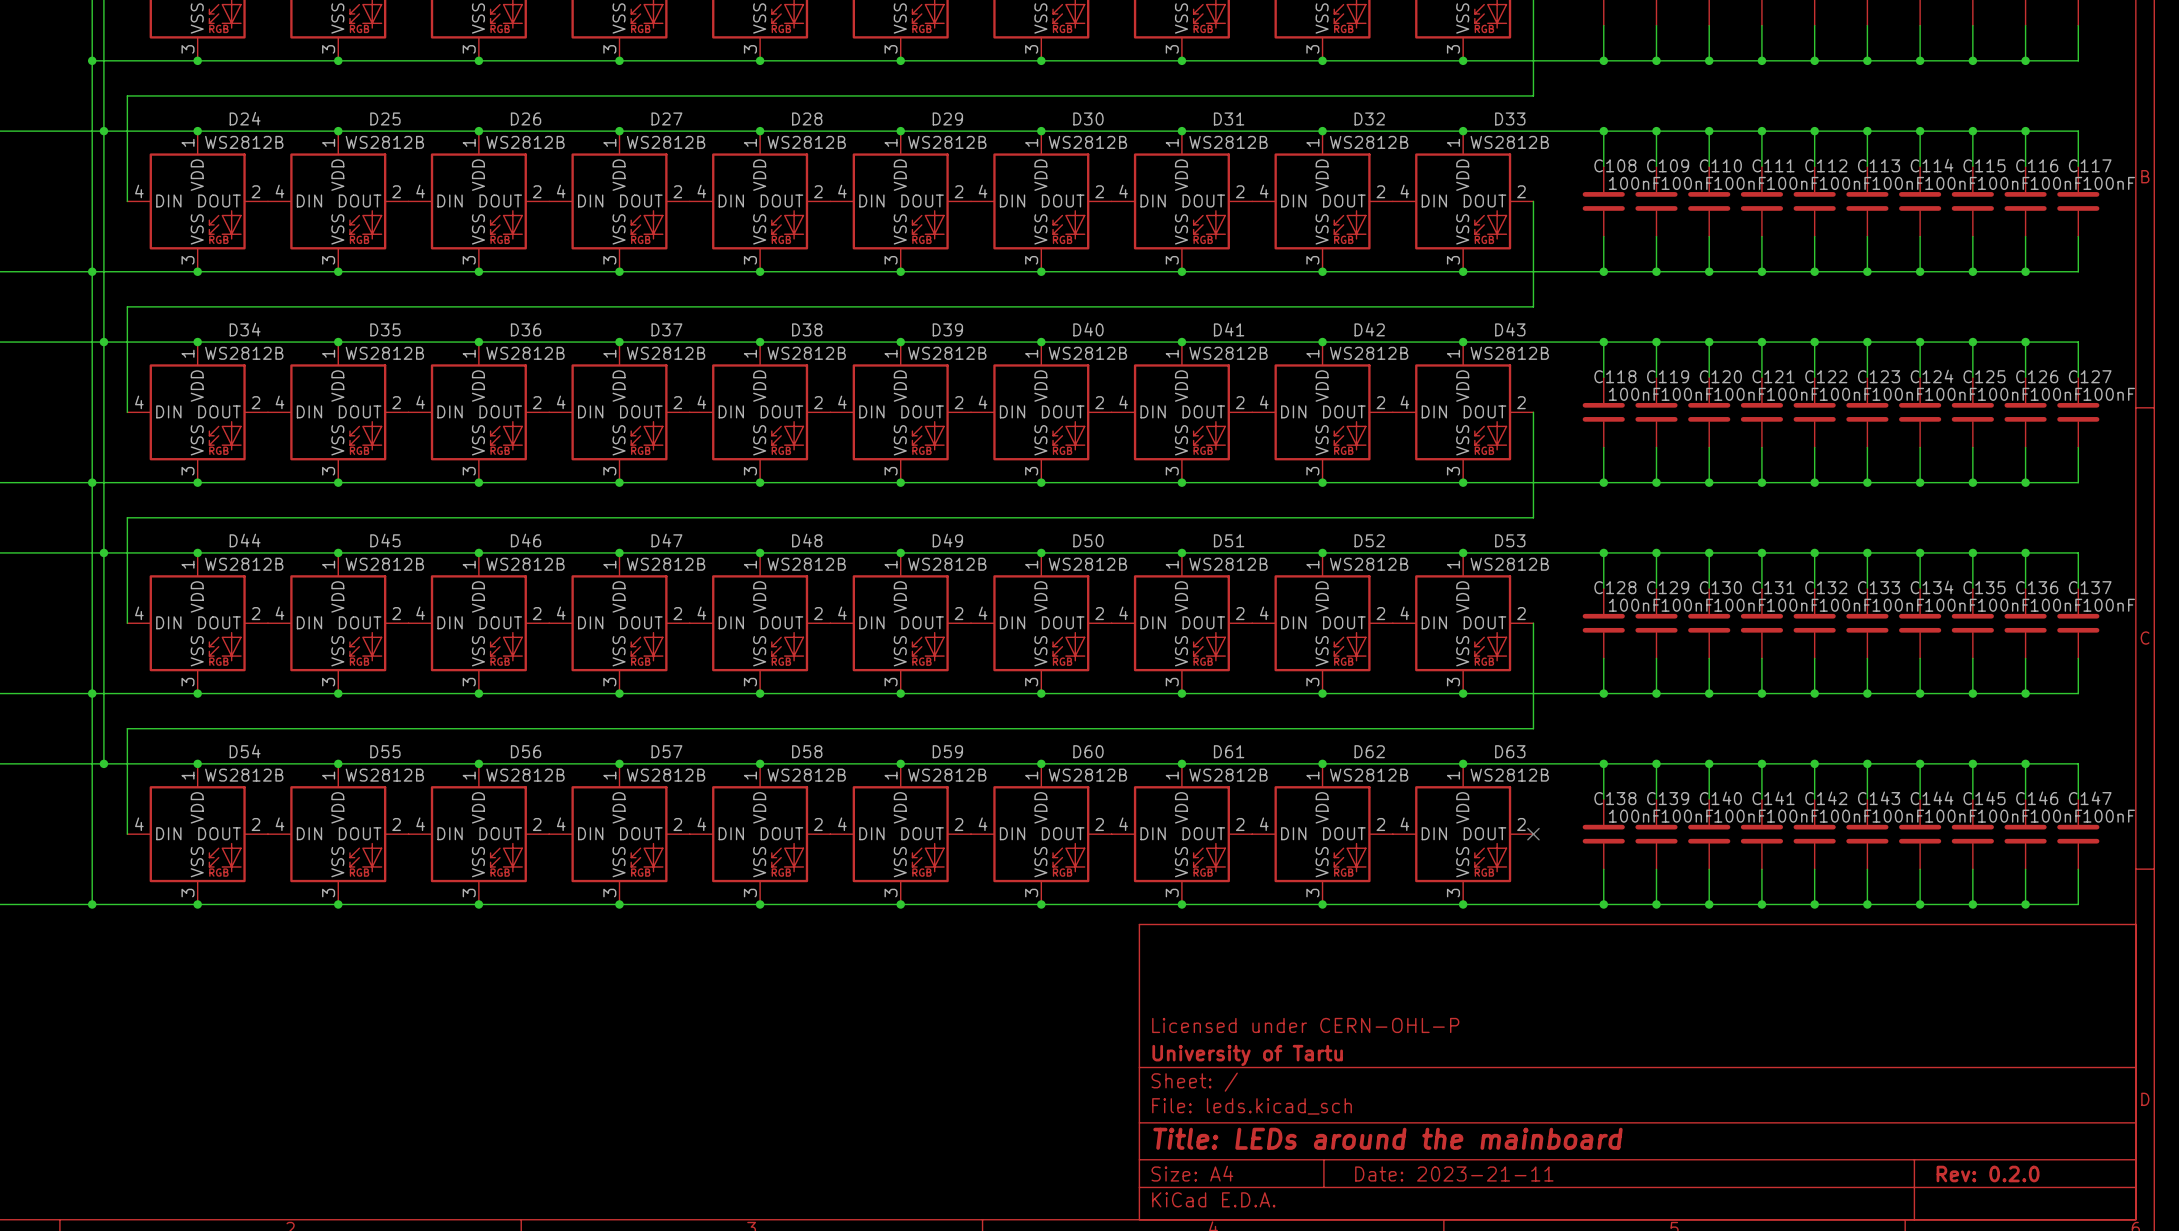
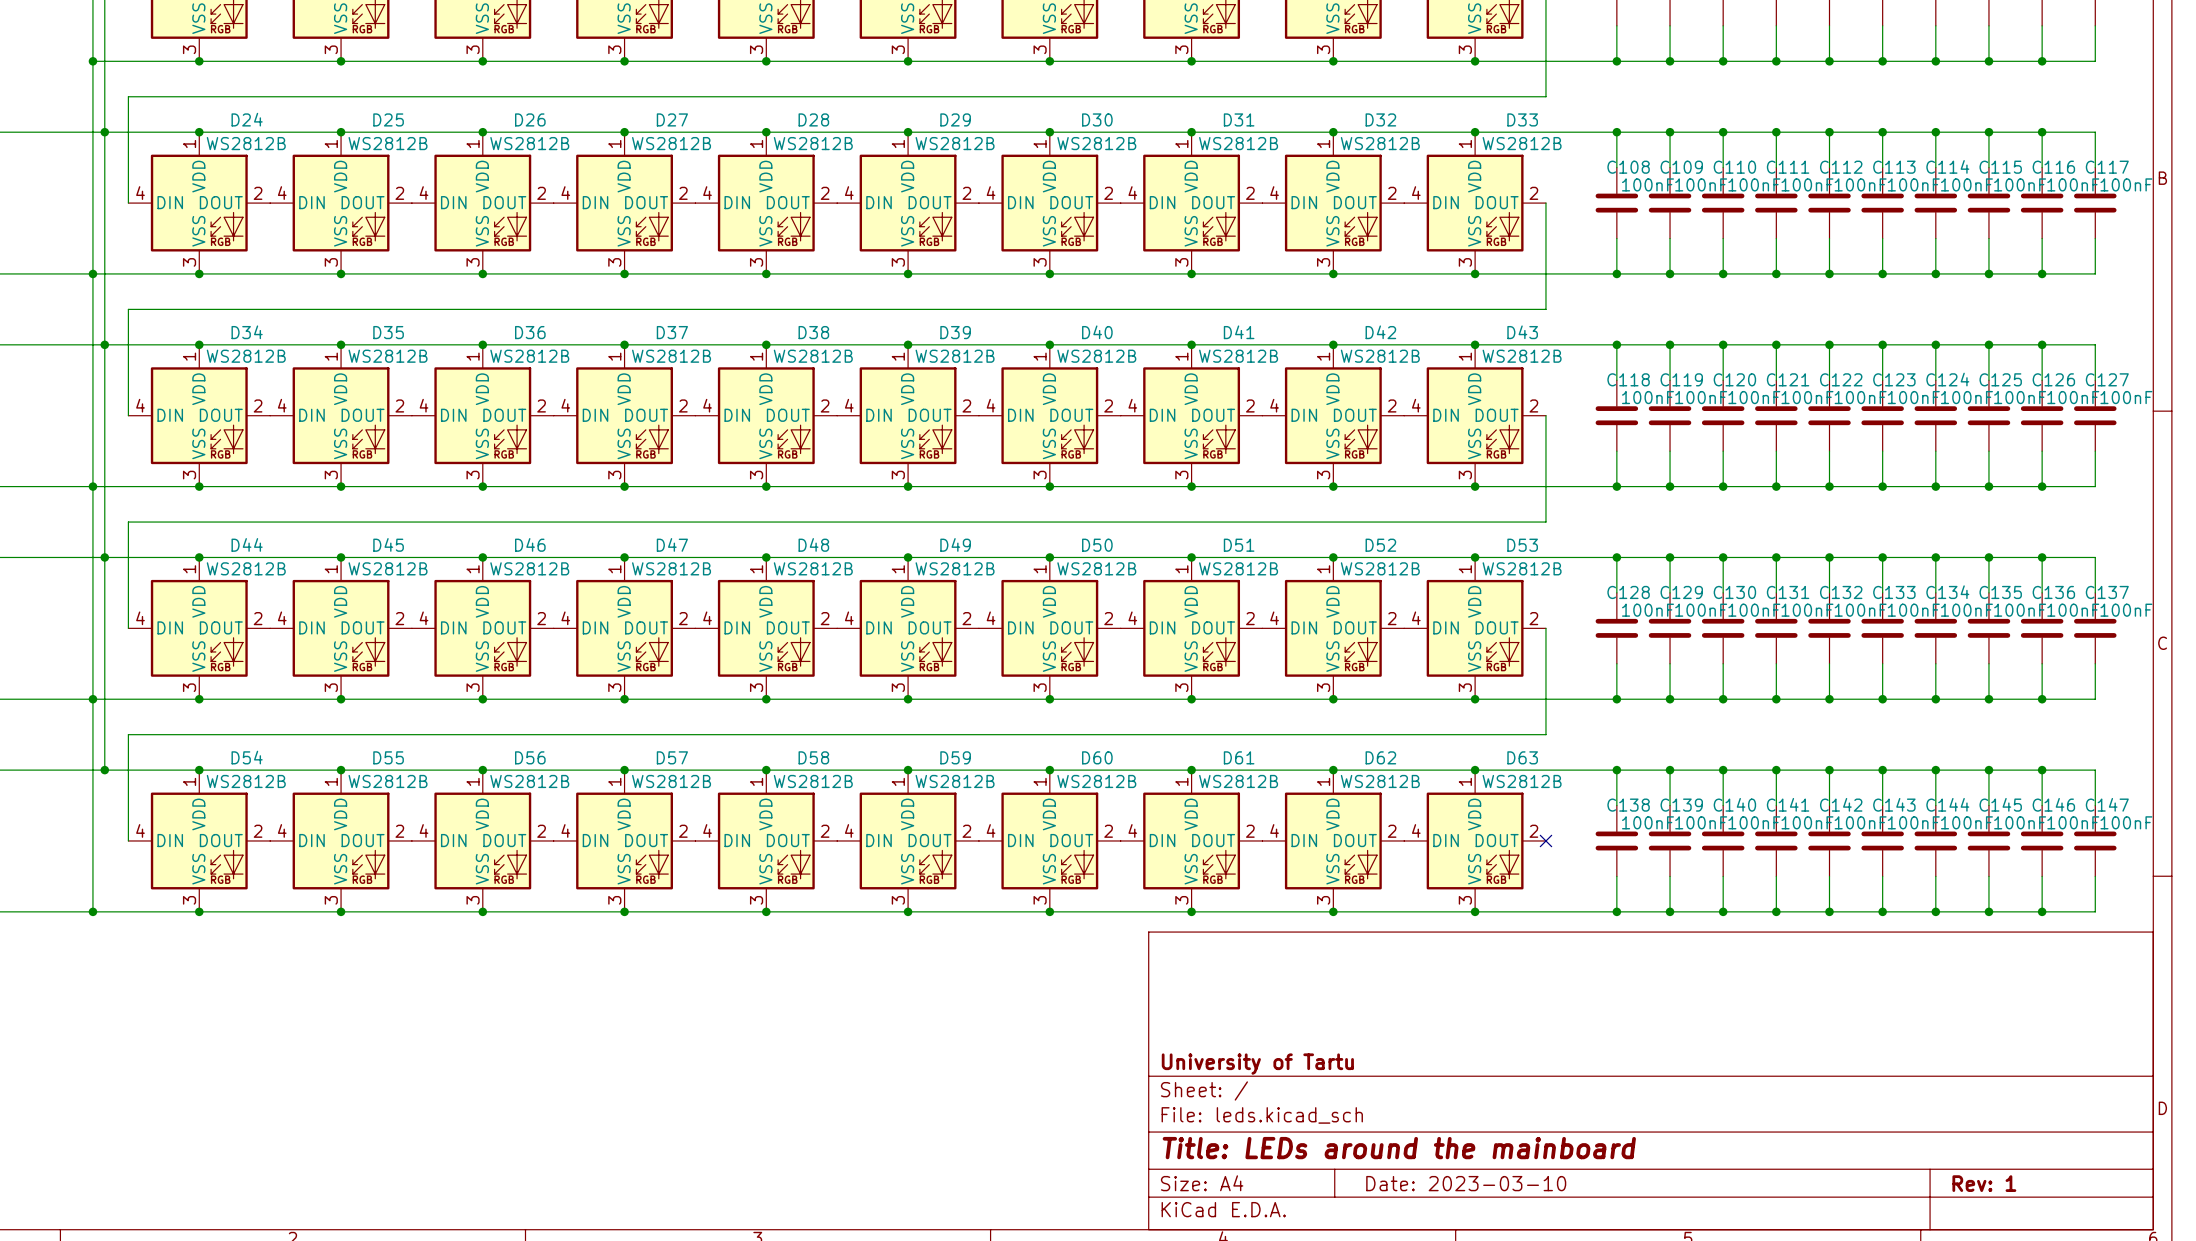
title block: Licensed under CERN-OHL-P (1305, 1025) -> none
title block: Date: 2023-21-11 (1454, 1174) -> Date: 2023-03-10 (1466, 1183)
title block: Rev: 0.2.0 (1988, 1174) -> Rev: 1 (1984, 1183)

